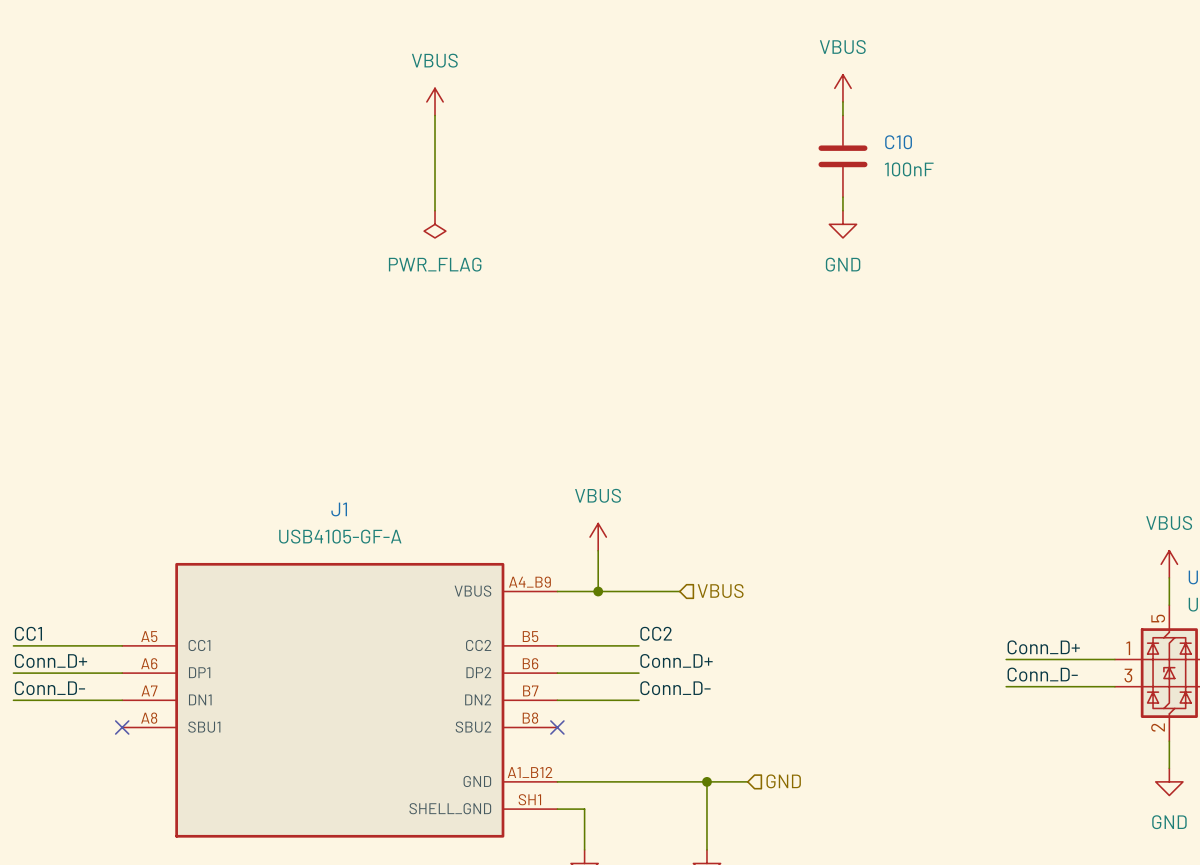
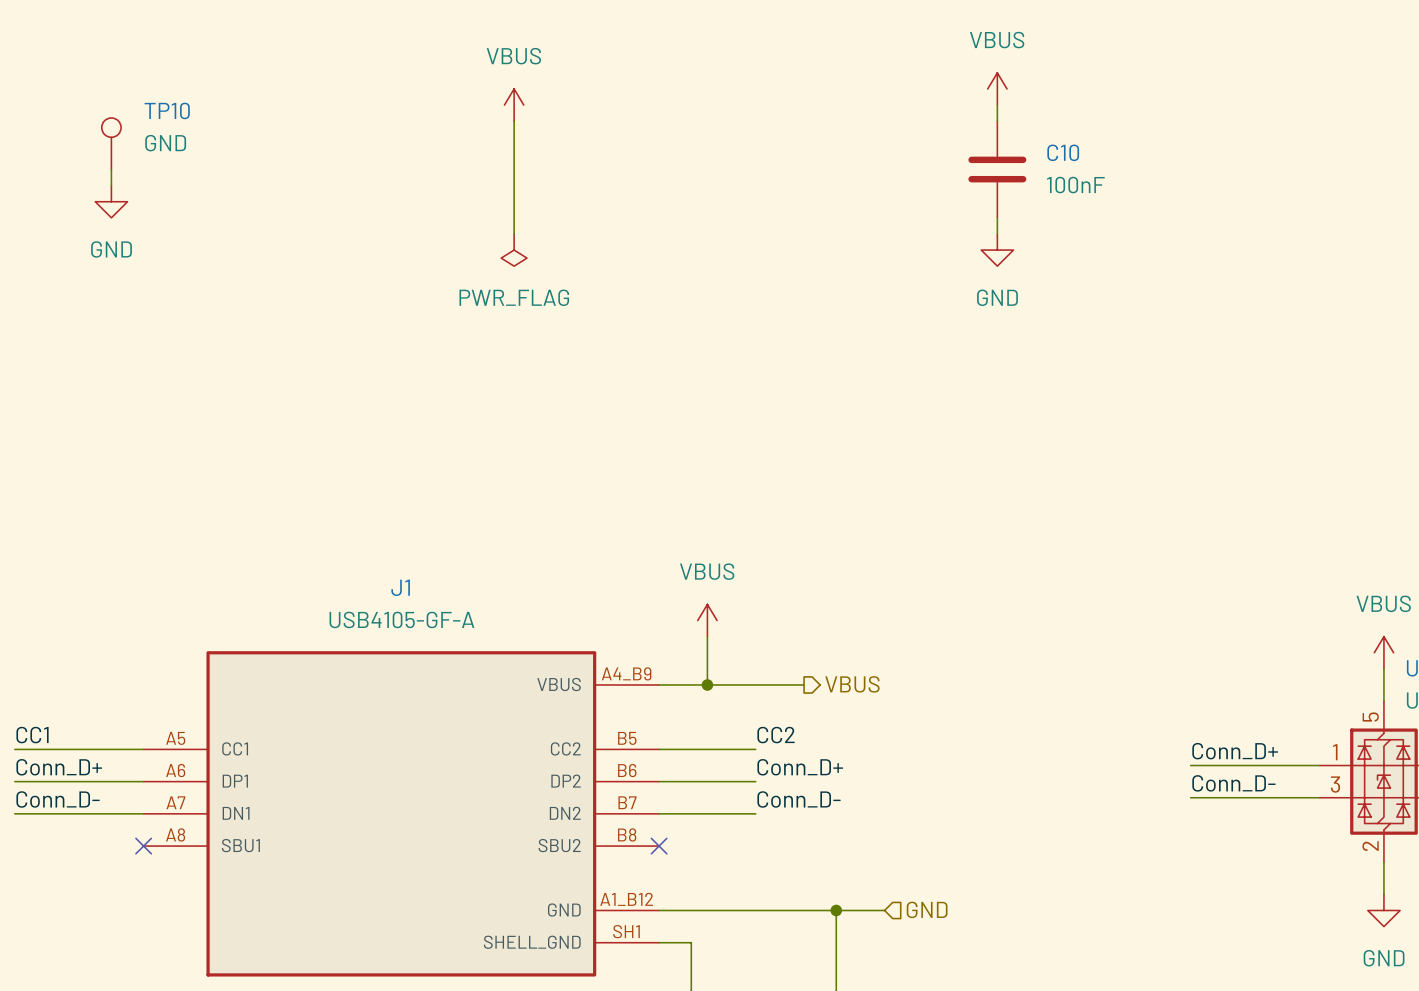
TP10: none -> GND (111, 143)
wire: none -> (111, 169) (111, 185)
power symbol: none -> GND (111, 201)
hierarchical label shape: input (720, 591) -> output (852, 684)

